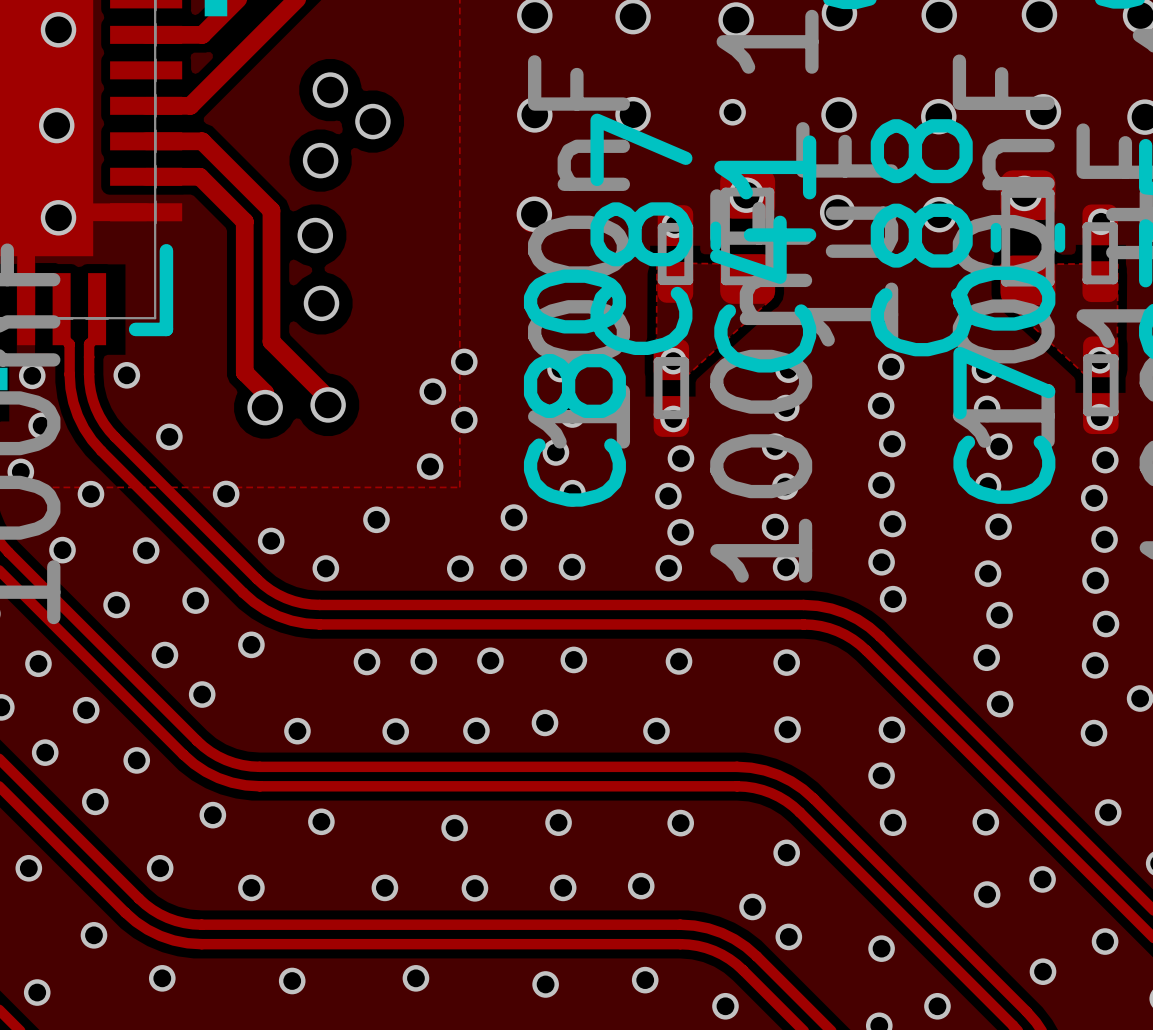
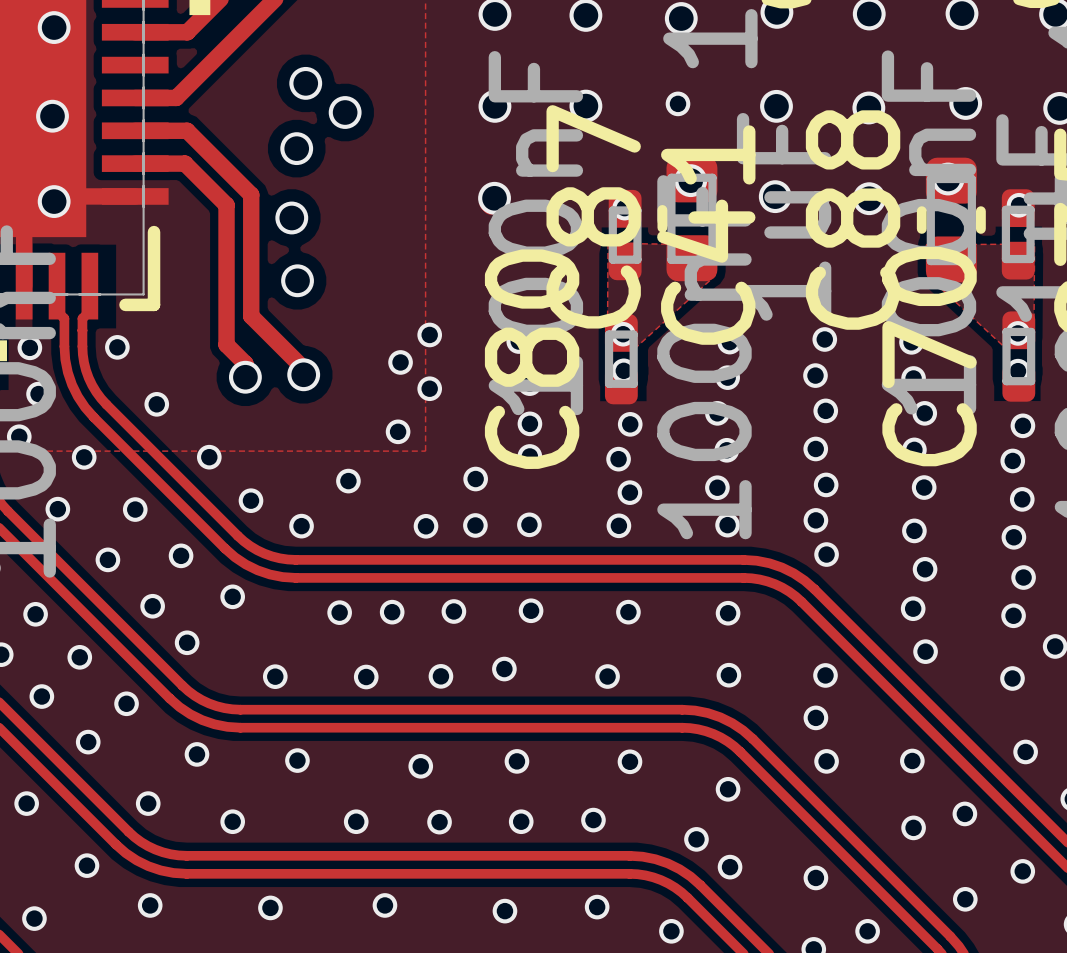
via position: (1099, 417) -> (1017, 371)
via position: (673, 418) -> (623, 370)
via position: (555, 452) -> (529, 423)

